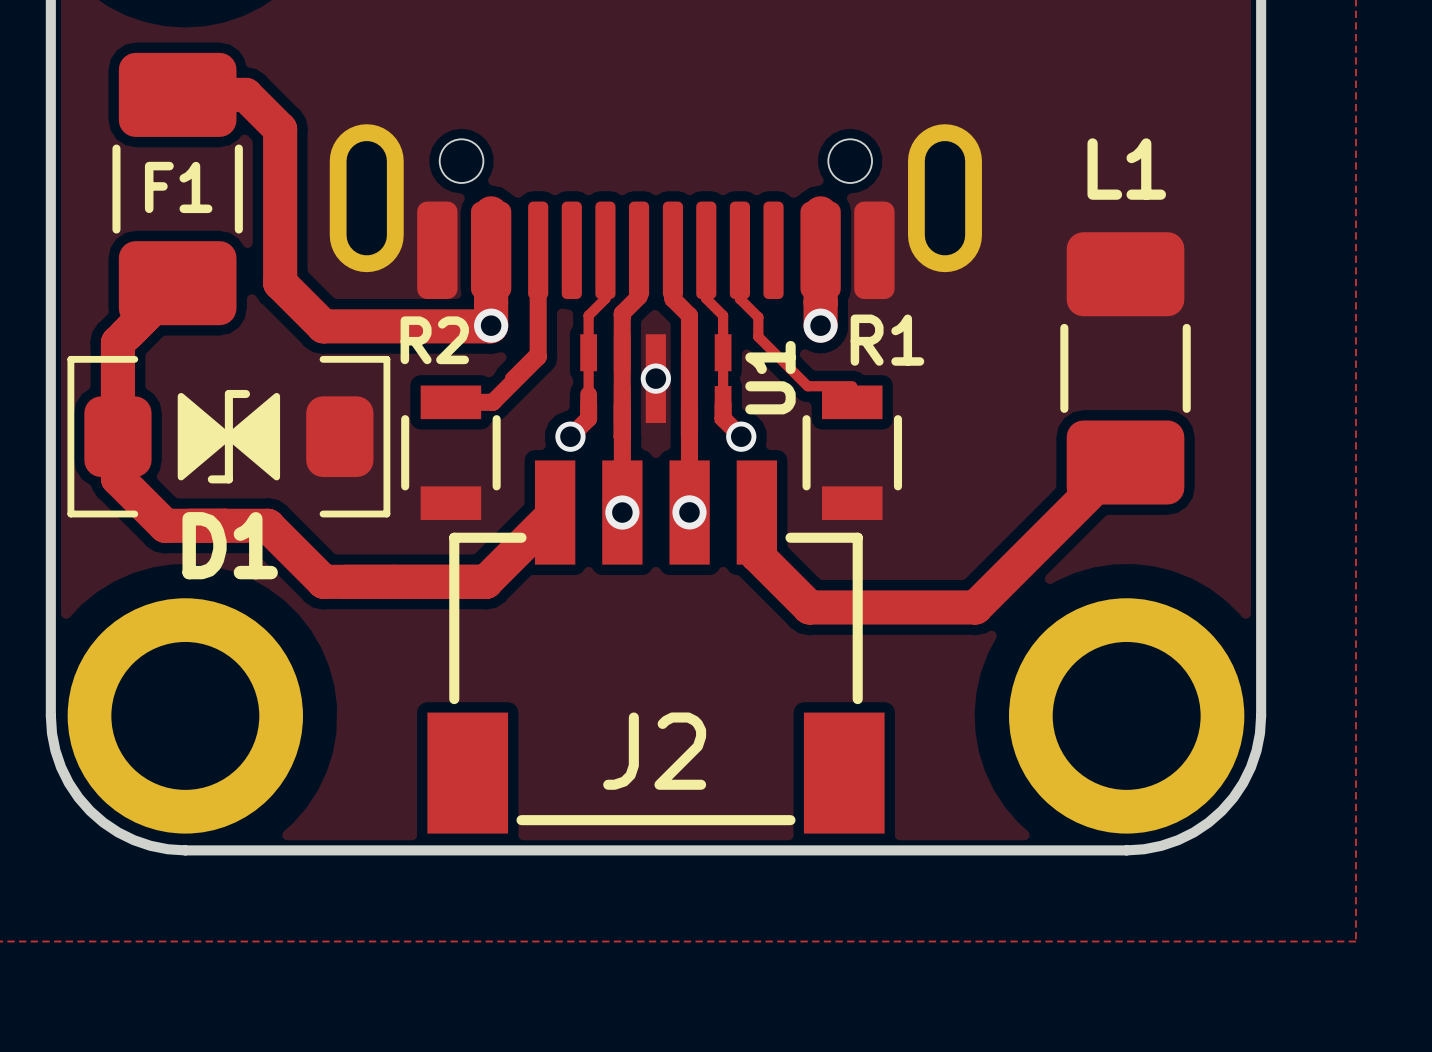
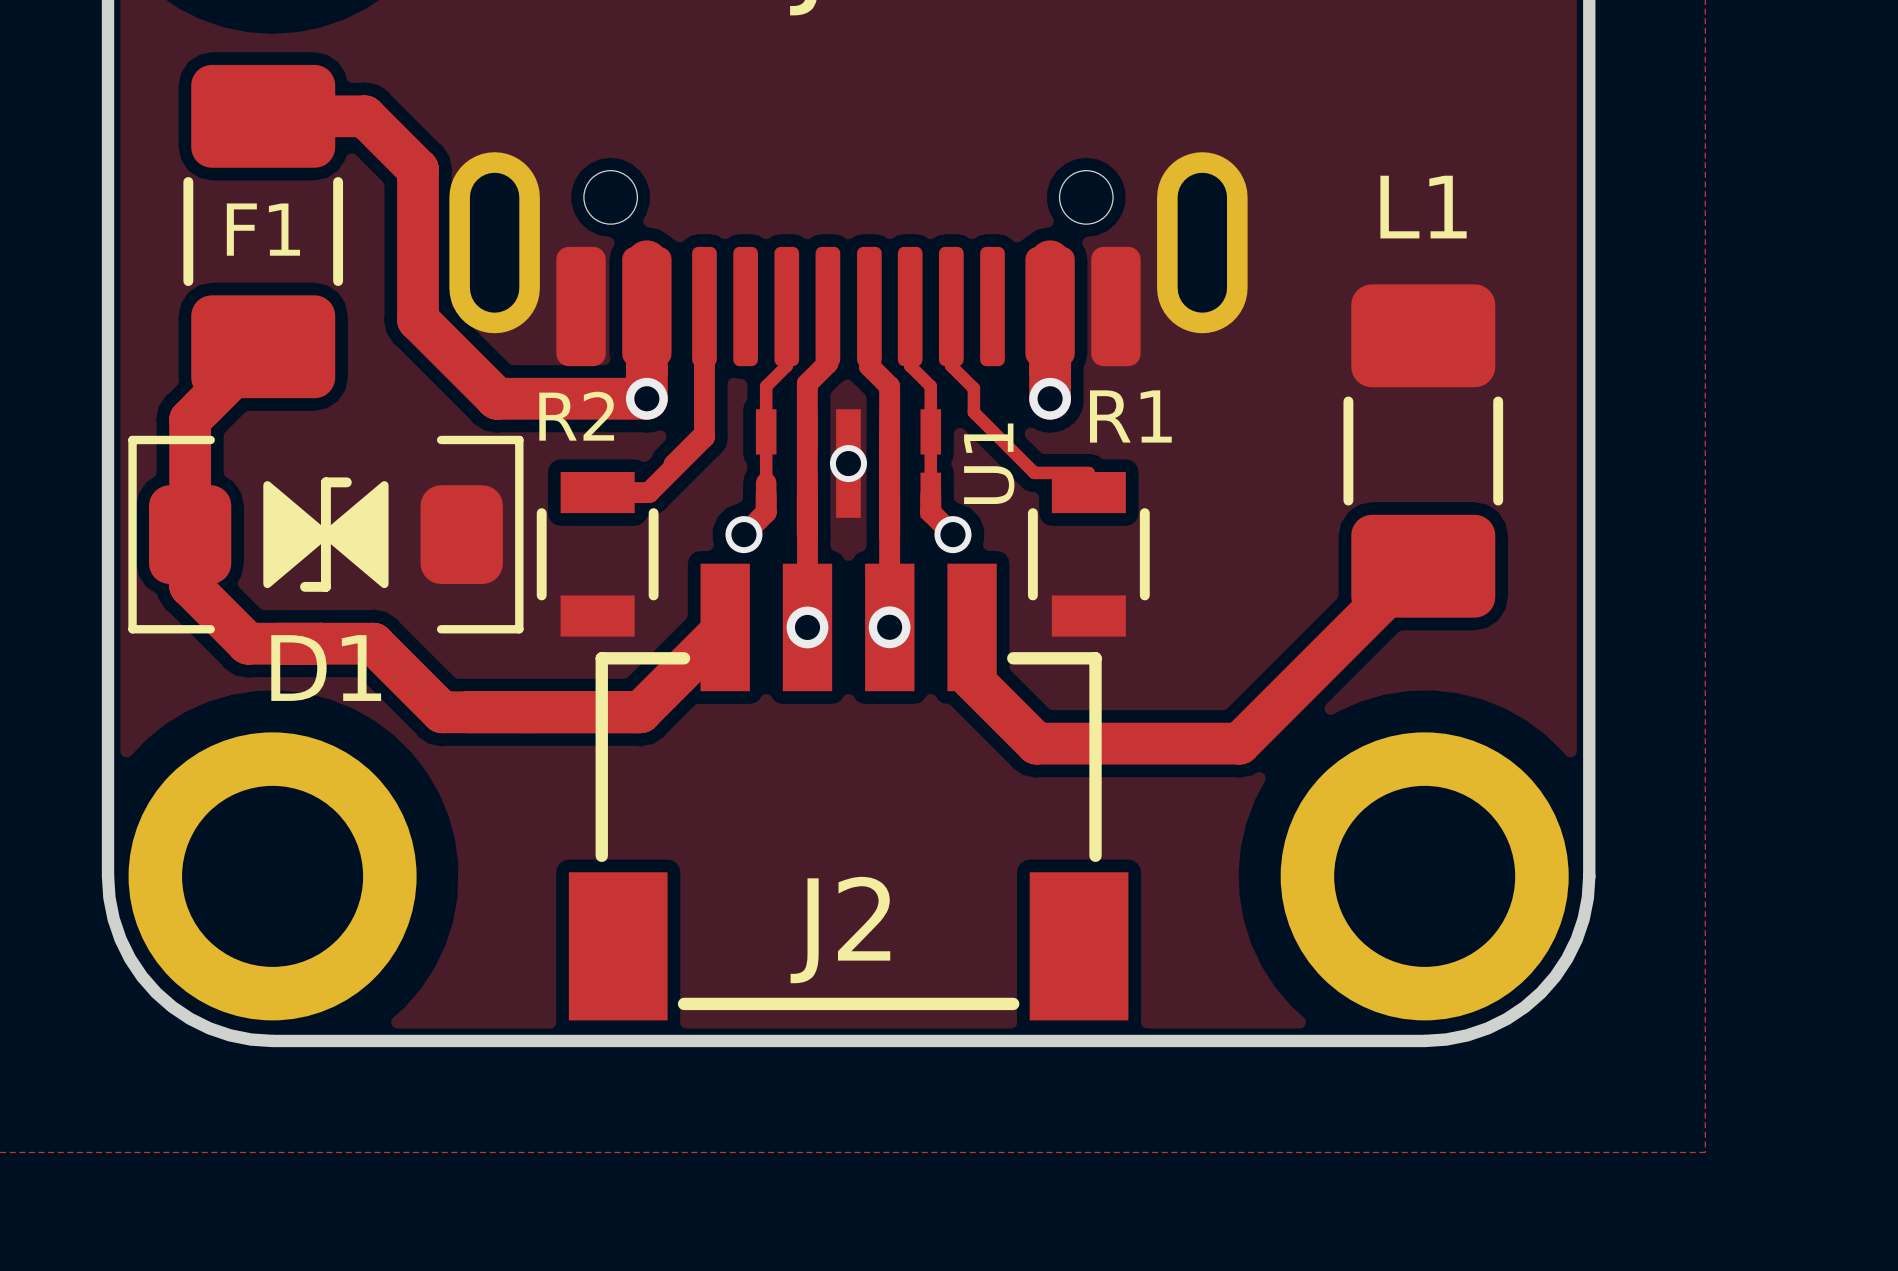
track: (245, 94) (280, 129) (280, 282) (323, 326) (490, 326) -> (346, 116) (364, 116) (418, 169) (418, 319) (497, 398) (646, 398)

